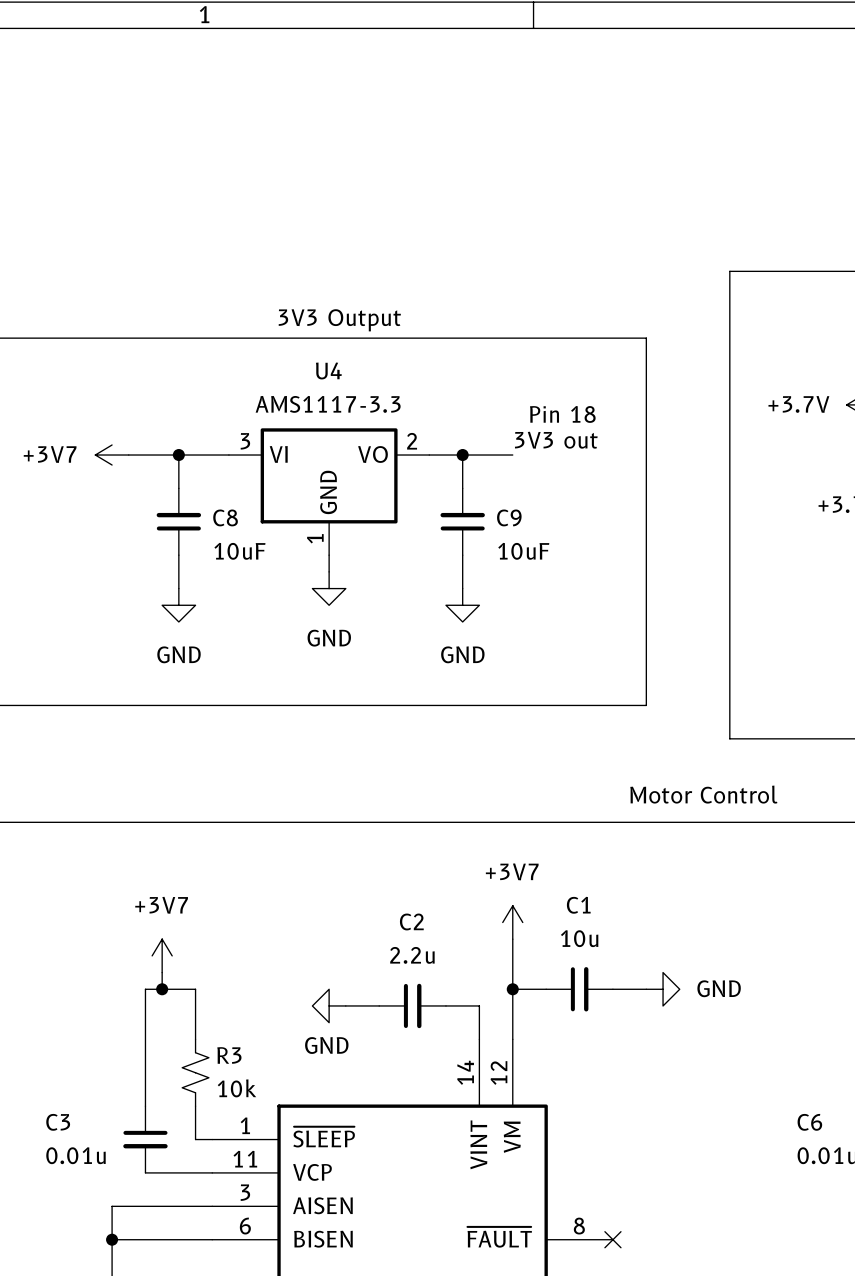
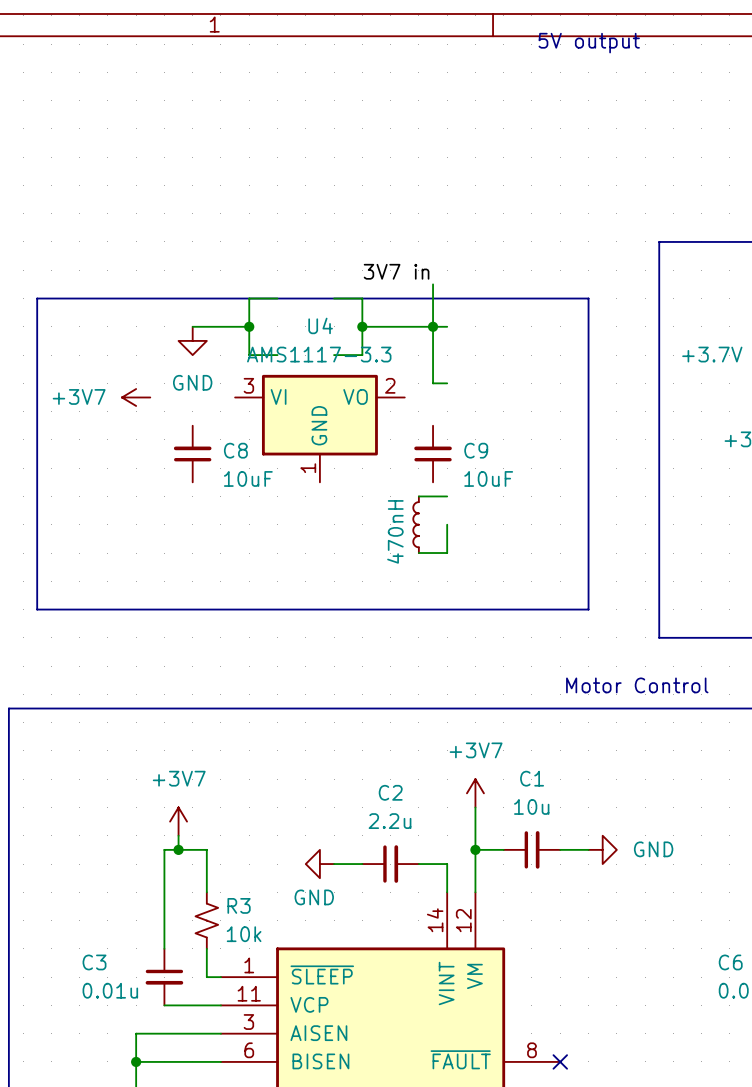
text: none -> 5V output (589, 43)
label: none -> 3V7 in (396, 271)
text: 3V3 Output (339, 320) -> none
wire: none -> (433, 284) (433, 383) (447, 383)
wire: none -> (277, 298) (249, 298) (249, 355) (277, 355)
wire: none -> (334, 298) (362, 298) (362, 355) (334, 355)
wire: none -> (192, 326) (249, 326)
junction: none -> (249, 326)
junction: none -> (362, 326)
junction: none -> (433, 326)
power symbol: none -> GND (192, 340)
text: Pin 18 (562, 414) -> none
label: 3V3 out (556, 440) -> none
wire: (128, 455) (228, 455) -> (362, 326) (447, 326)
wire: (178, 455) (178, 488) -> none
junction: (178, 455) -> none
wire: (429, 455) (512, 455) -> none
wire: (462, 455) (462, 488) -> none
junction: (462, 455) -> none
wire: (178, 555) (178, 588) -> none
wire: (329, 555) (329, 571) -> none
wire: (462, 555) (462, 588) -> none
wire: none -> (418, 496) (447, 496)
power symbol: GND (329, 588) -> none
power symbol: GND (178, 605) -> none
part: none -> 470nH (416, 524)
power symbol: GND (462, 605) -> none
wire: none -> (447, 524) (447, 553) (418, 553)

